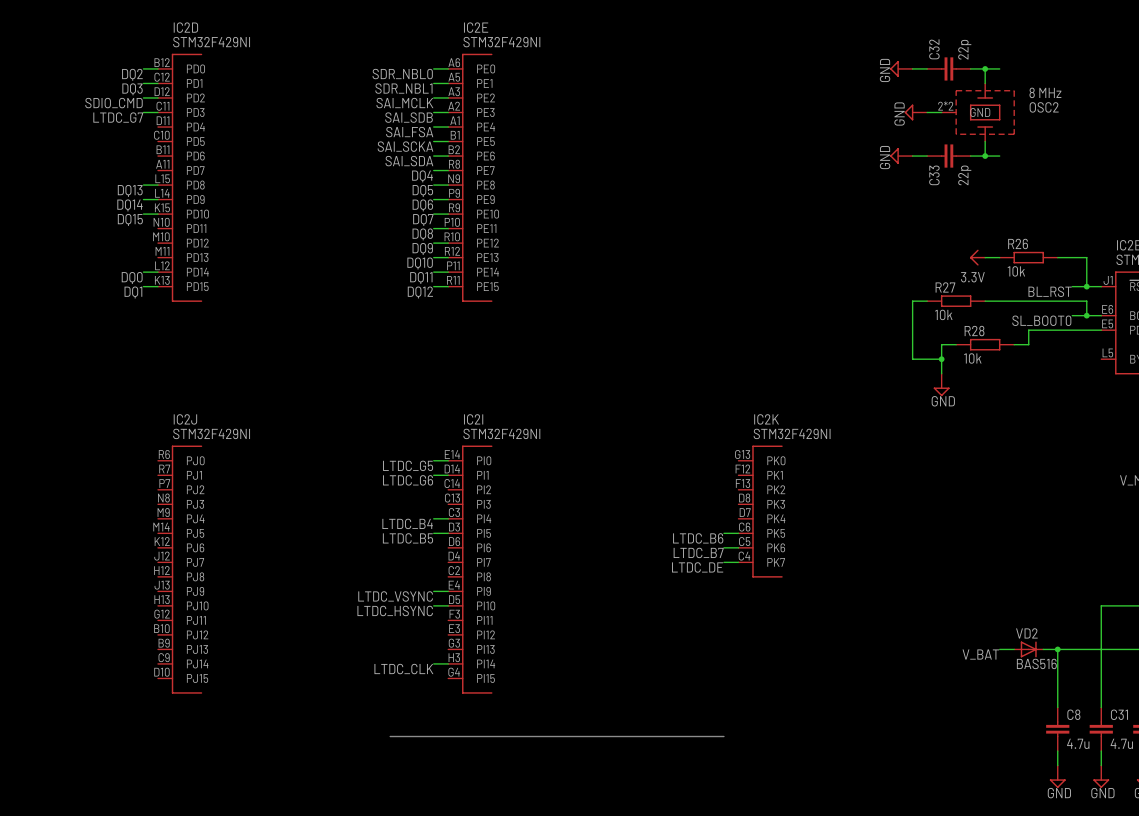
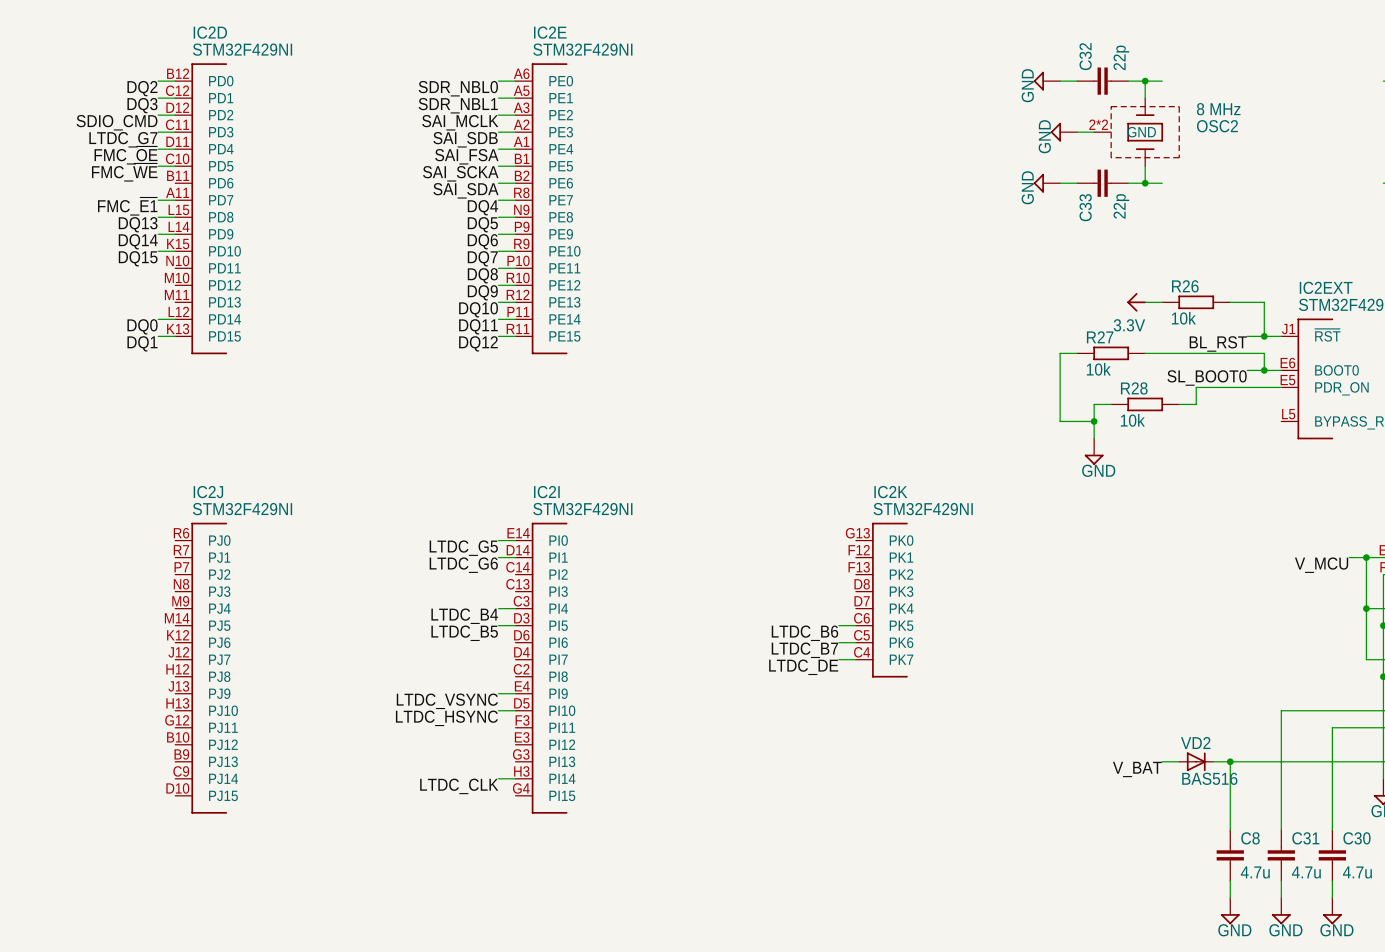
wire: none -> (158, 149) (175, 149)
label: none -> FMC_~{OE} (126, 155)
wire: none -> (158, 166) (175, 166)
label: none -> FMC_~{WE} (124, 172)
wire: none -> (158, 200) (175, 200)
label: none -> FMC_~{E1} (127, 206)
bus: (390, 736) (723, 736) -> none

